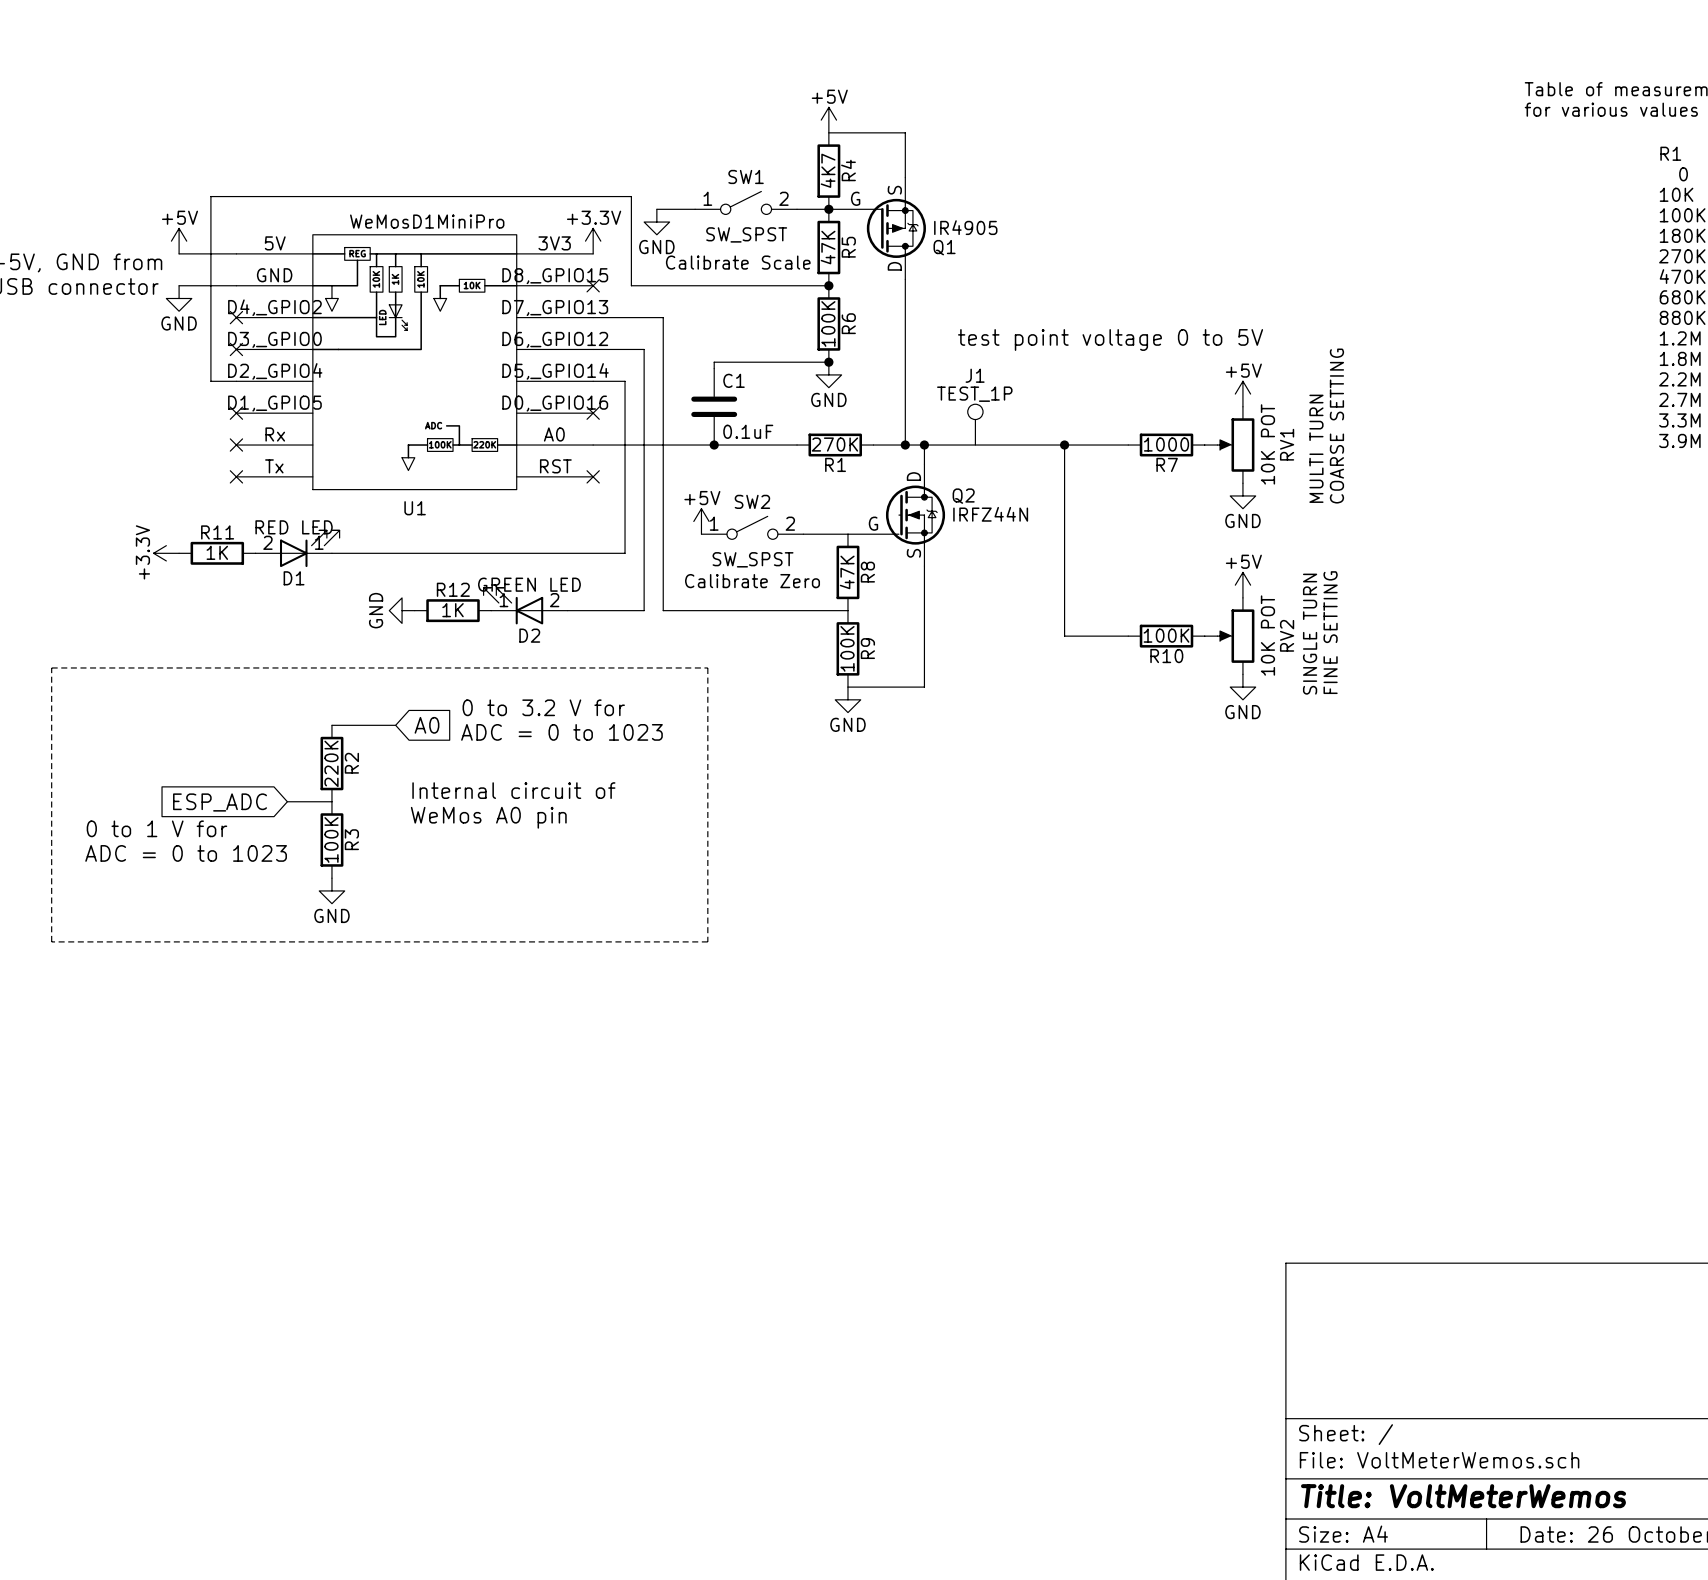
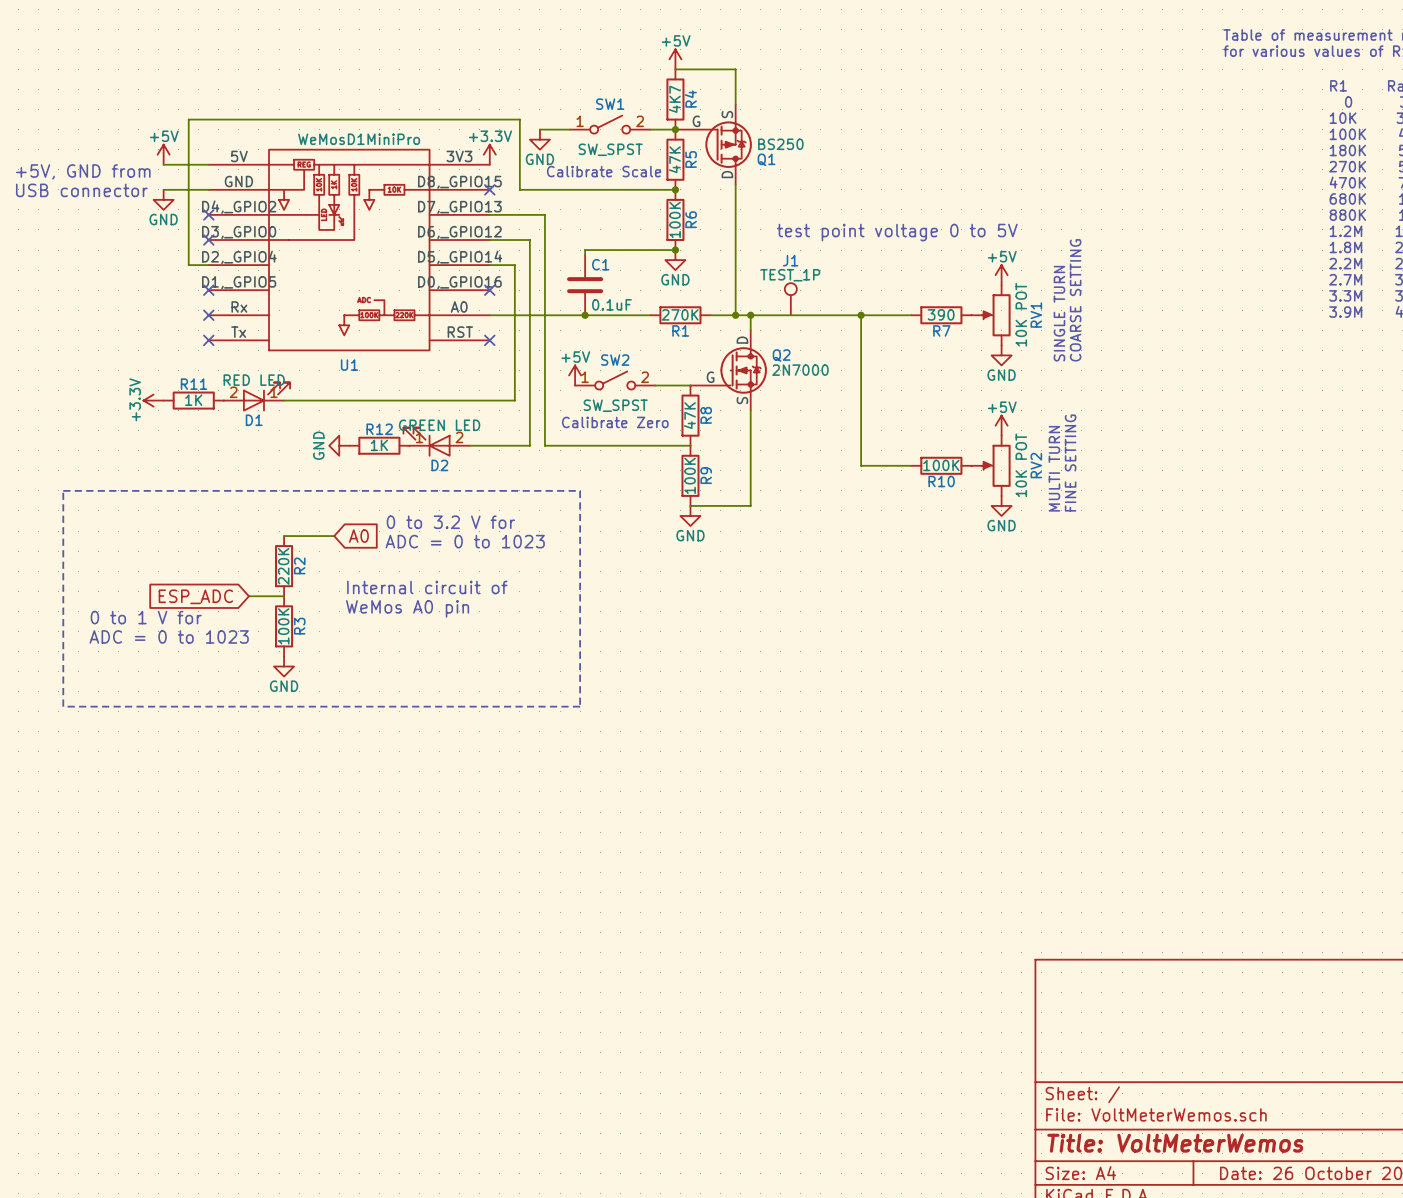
Q1 value: IR4905 (965, 227) -> BS250 (780, 144)
R7 value: 1000 (1166, 444) -> 390 (941, 314)
text: MULTI TURN (1316, 448) -> SINGLE TURN (1059, 313)
Q2 value: IRFZ44N (990, 514) -> 2N7000 (800, 370)
text: SINGLE TURN (1310, 634) -> MULTI TURN (1054, 468)

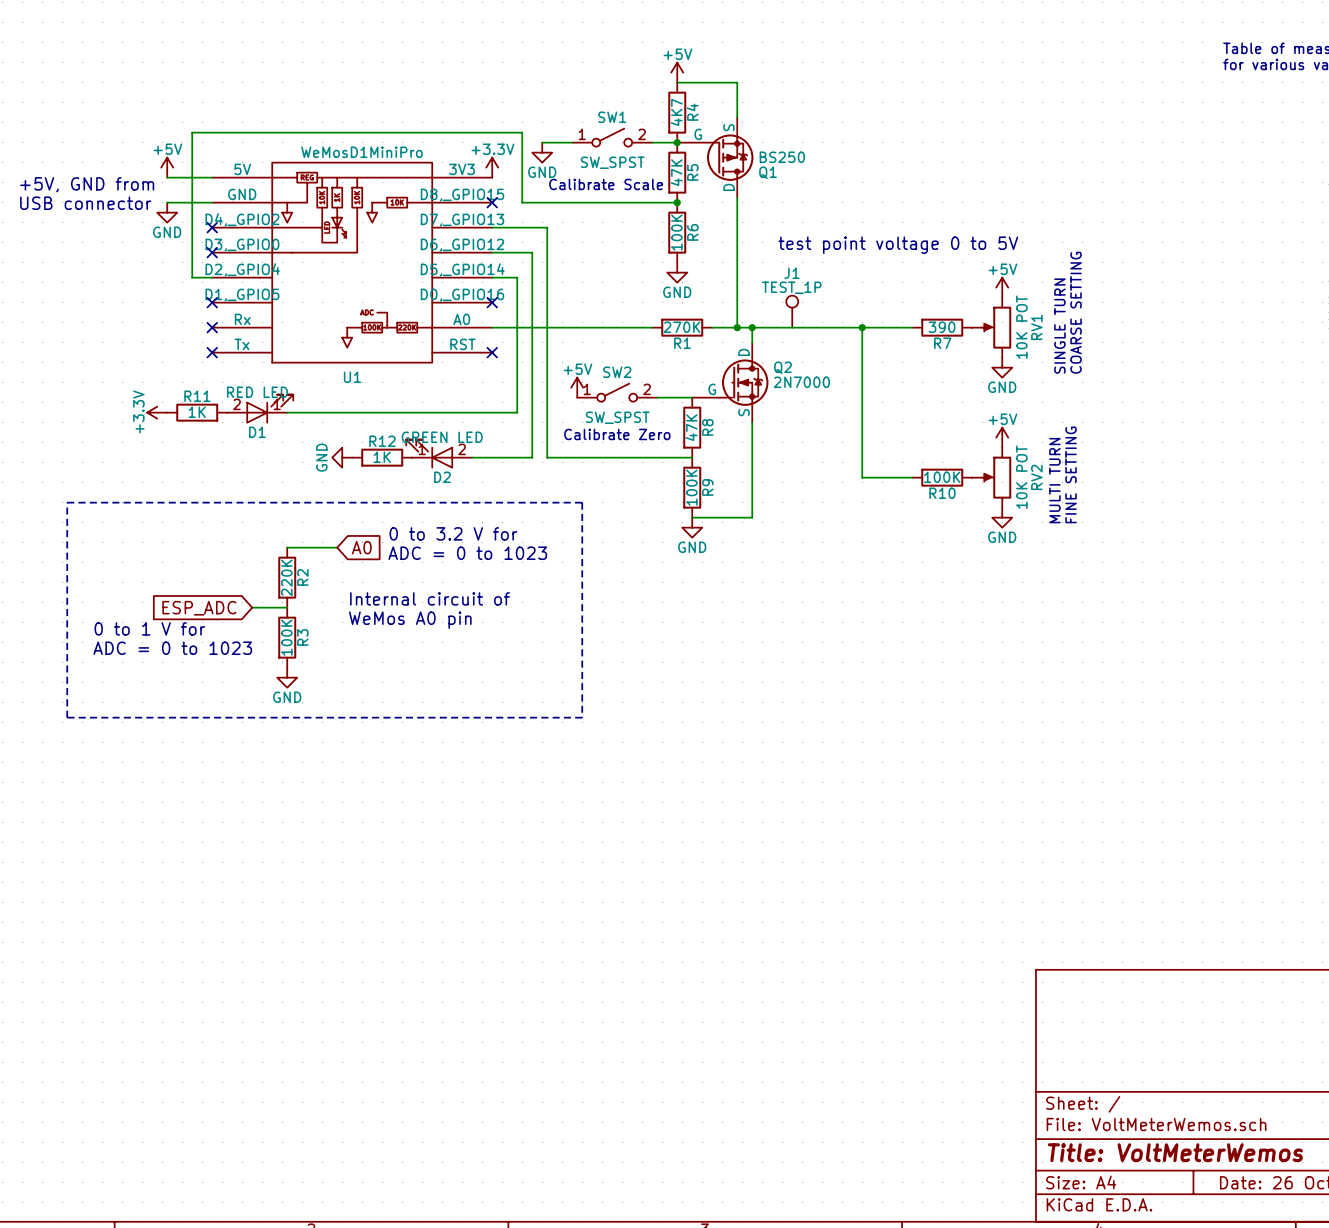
wire: (675, 250) (585, 250) (585, 255) -> none
junction: (675, 250) -> none
C1: 0.1uF (585, 285) -> none
junction: (585, 315) -> none

